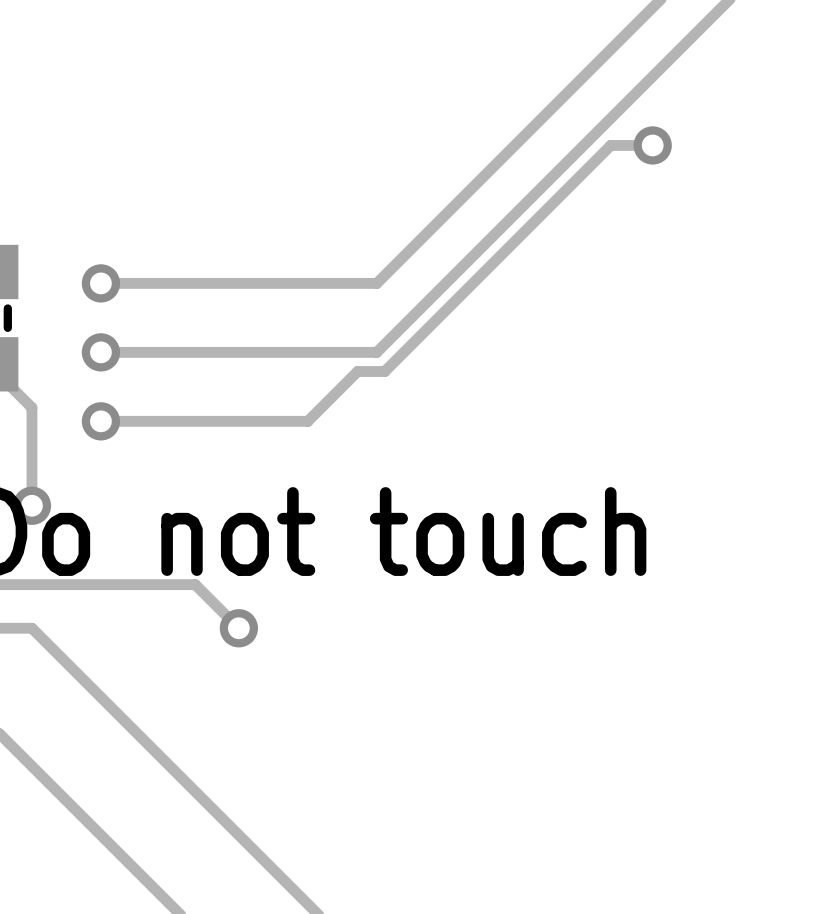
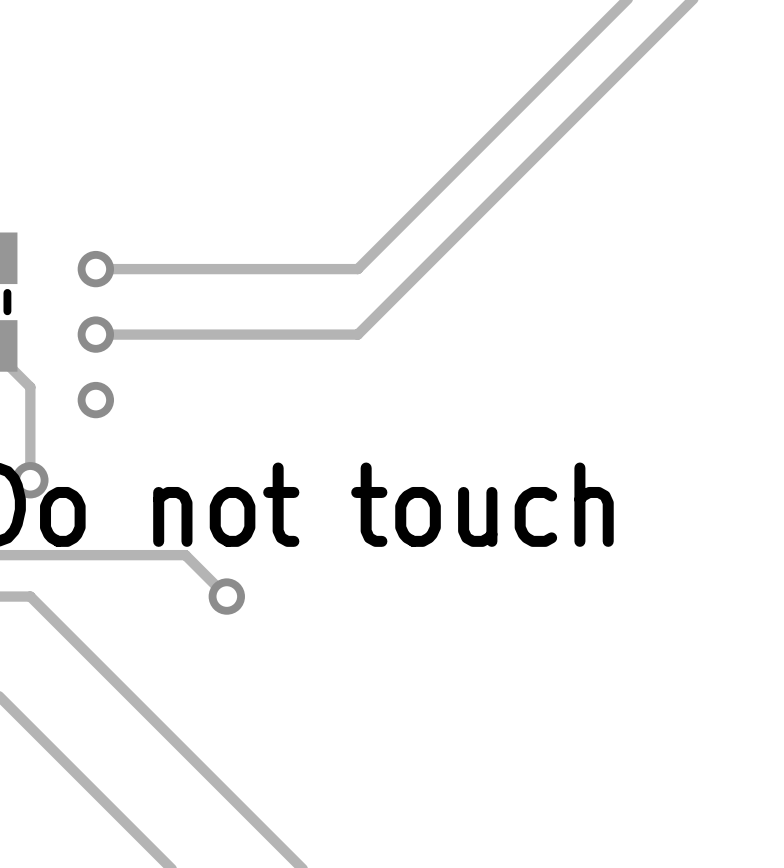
track: (652, 145) (610, 145) (384, 371) (357, 371) (307, 421) (100, 421) -> none
via: (652, 145) -> none

